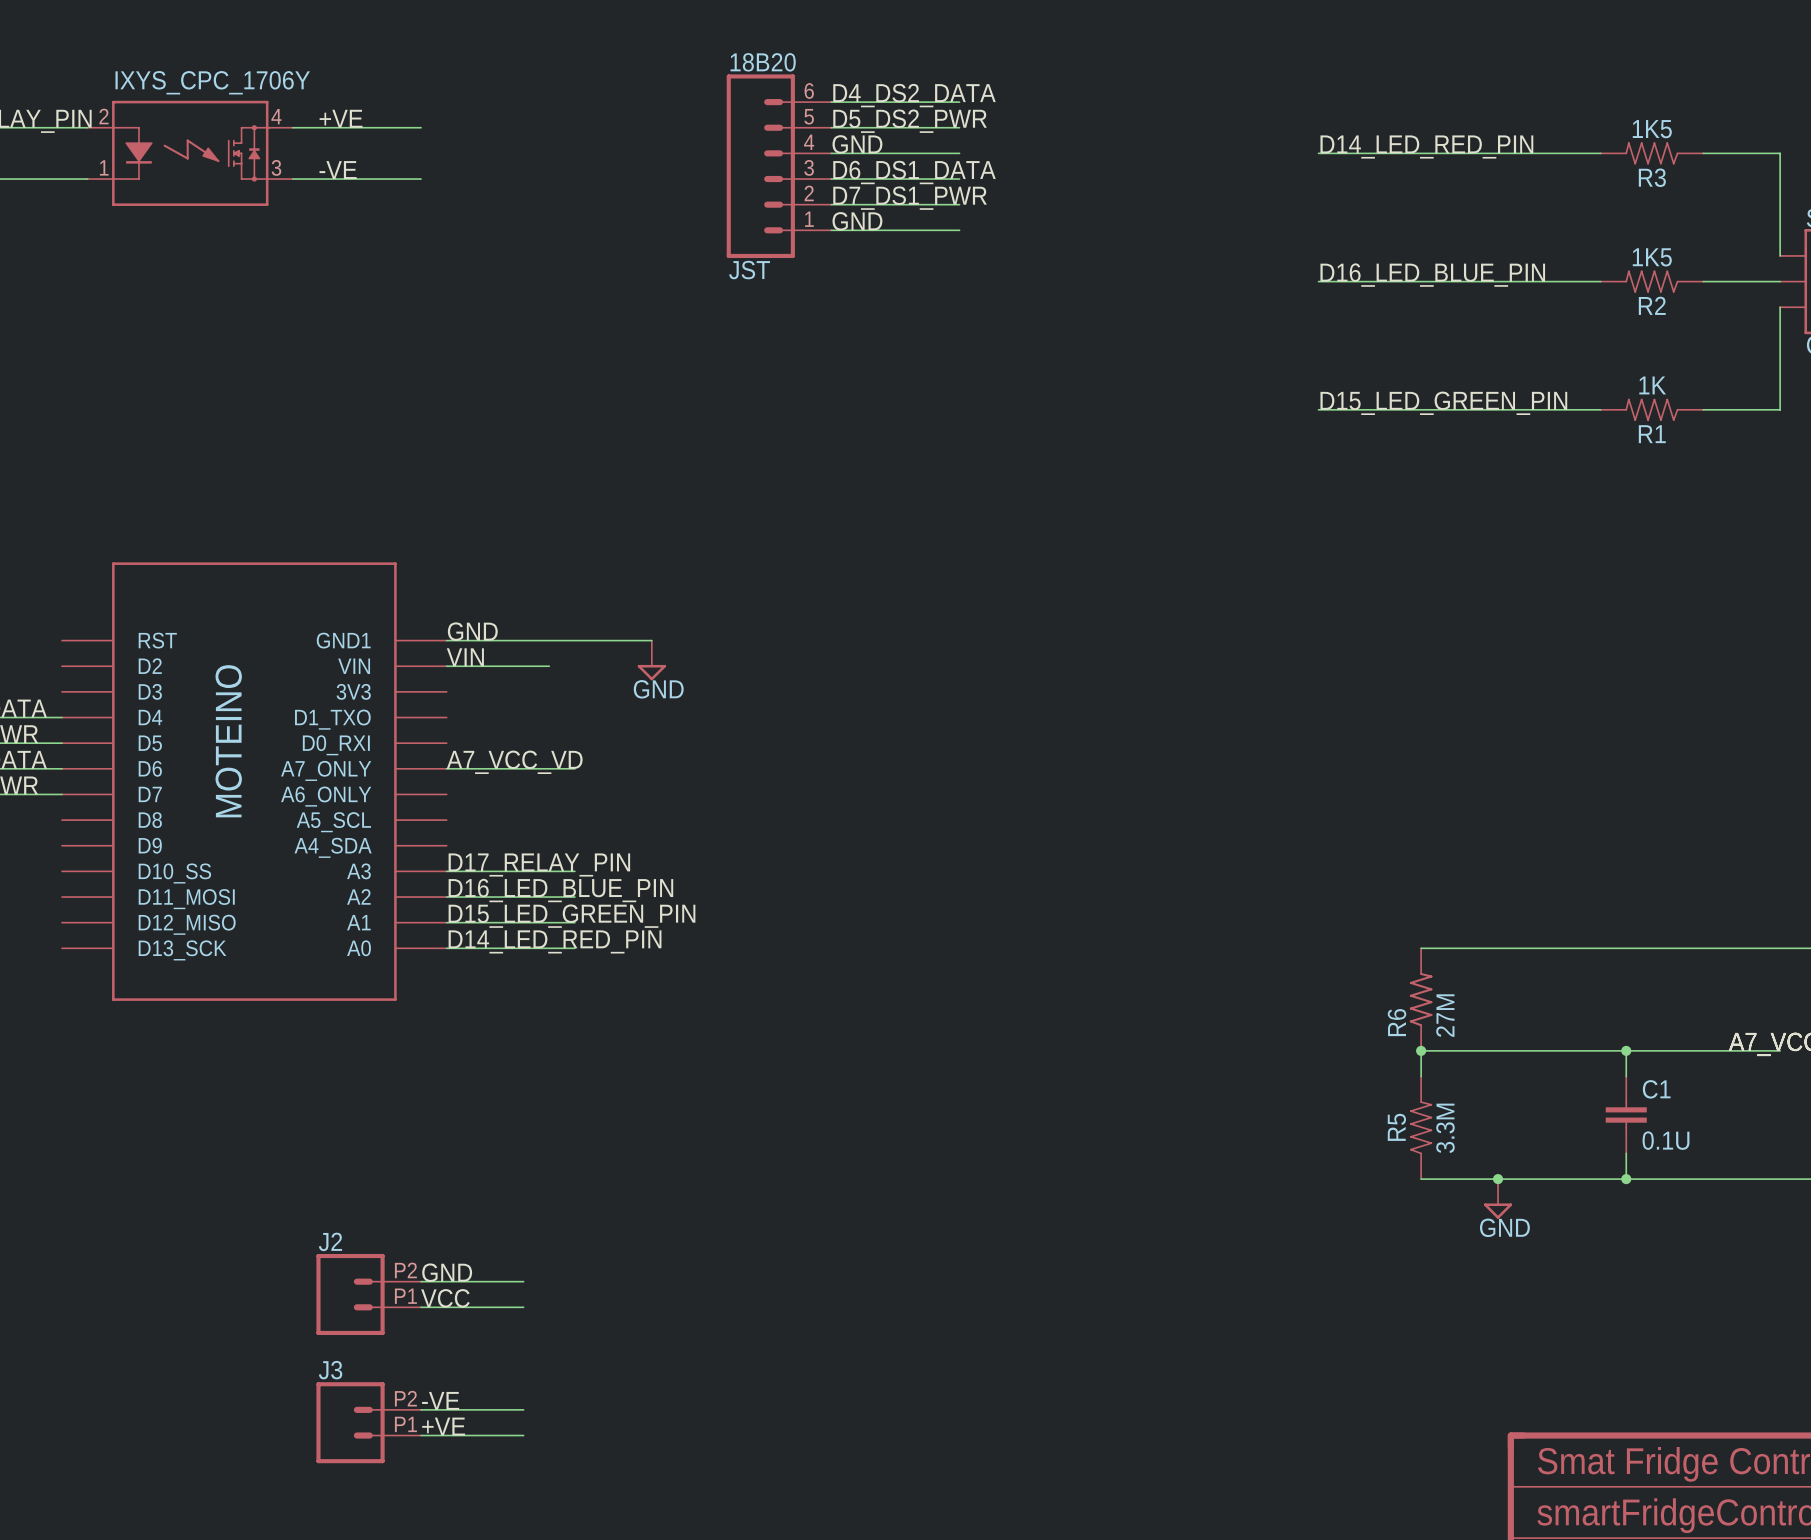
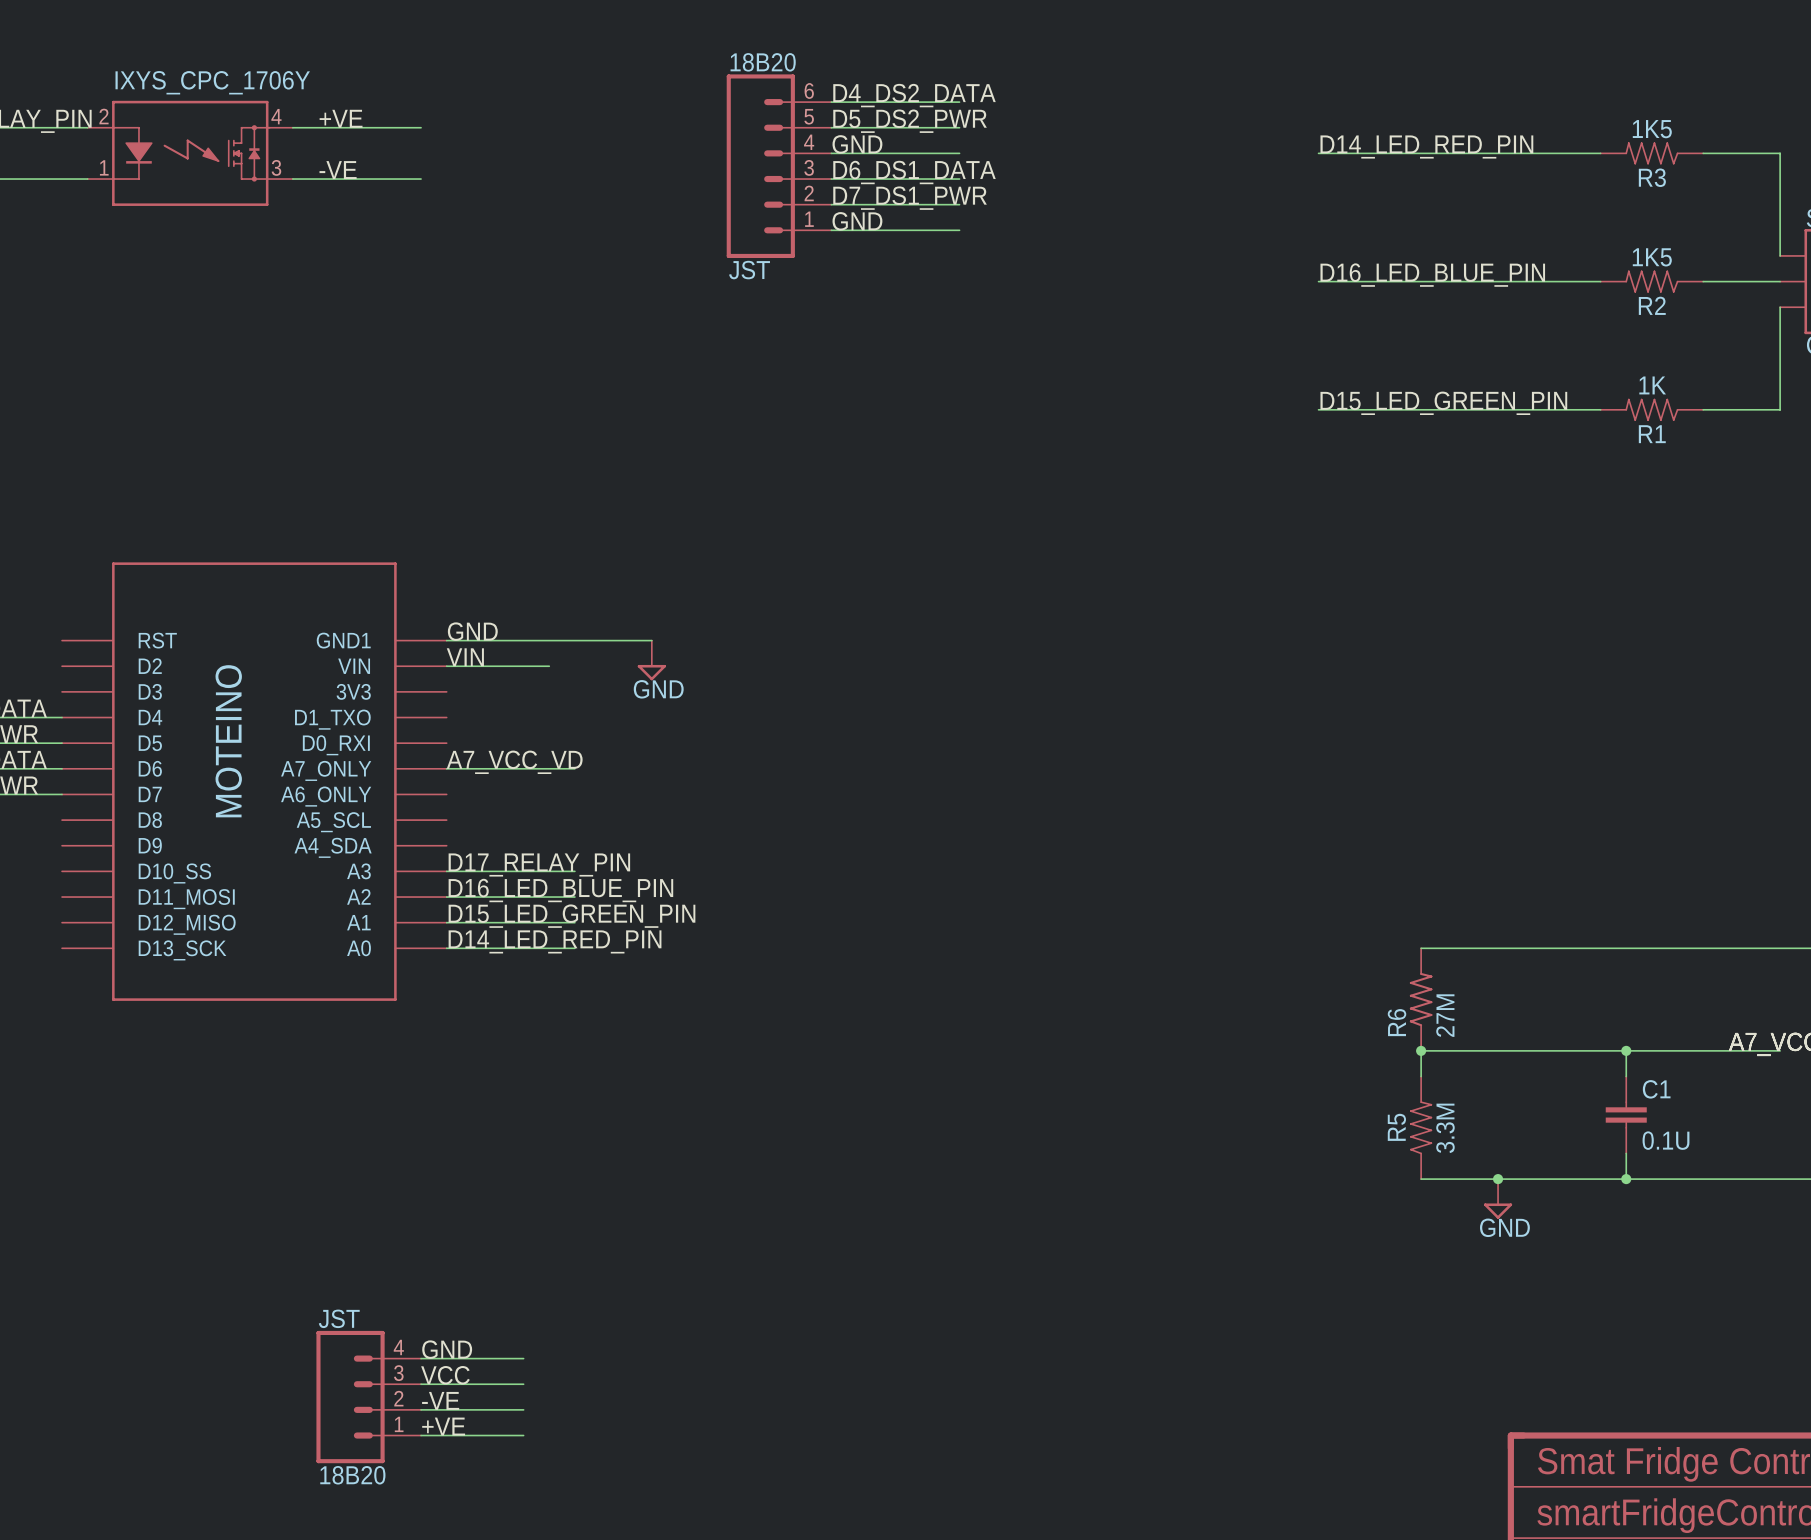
label position: GND (447, 1272) -> GND (447, 1349)
wire: (421, 1281) (523, 1281) -> (421, 1384) (523, 1384)
J2: (368, 1294) -> none
label position: VCC (445, 1298) -> VCC (445, 1375)
wire: (421, 1307) (523, 1307) -> (421, 1358) (523, 1358)
JST: none -> 18B20 (368, 1397)
J3: (368, 1422) -> none

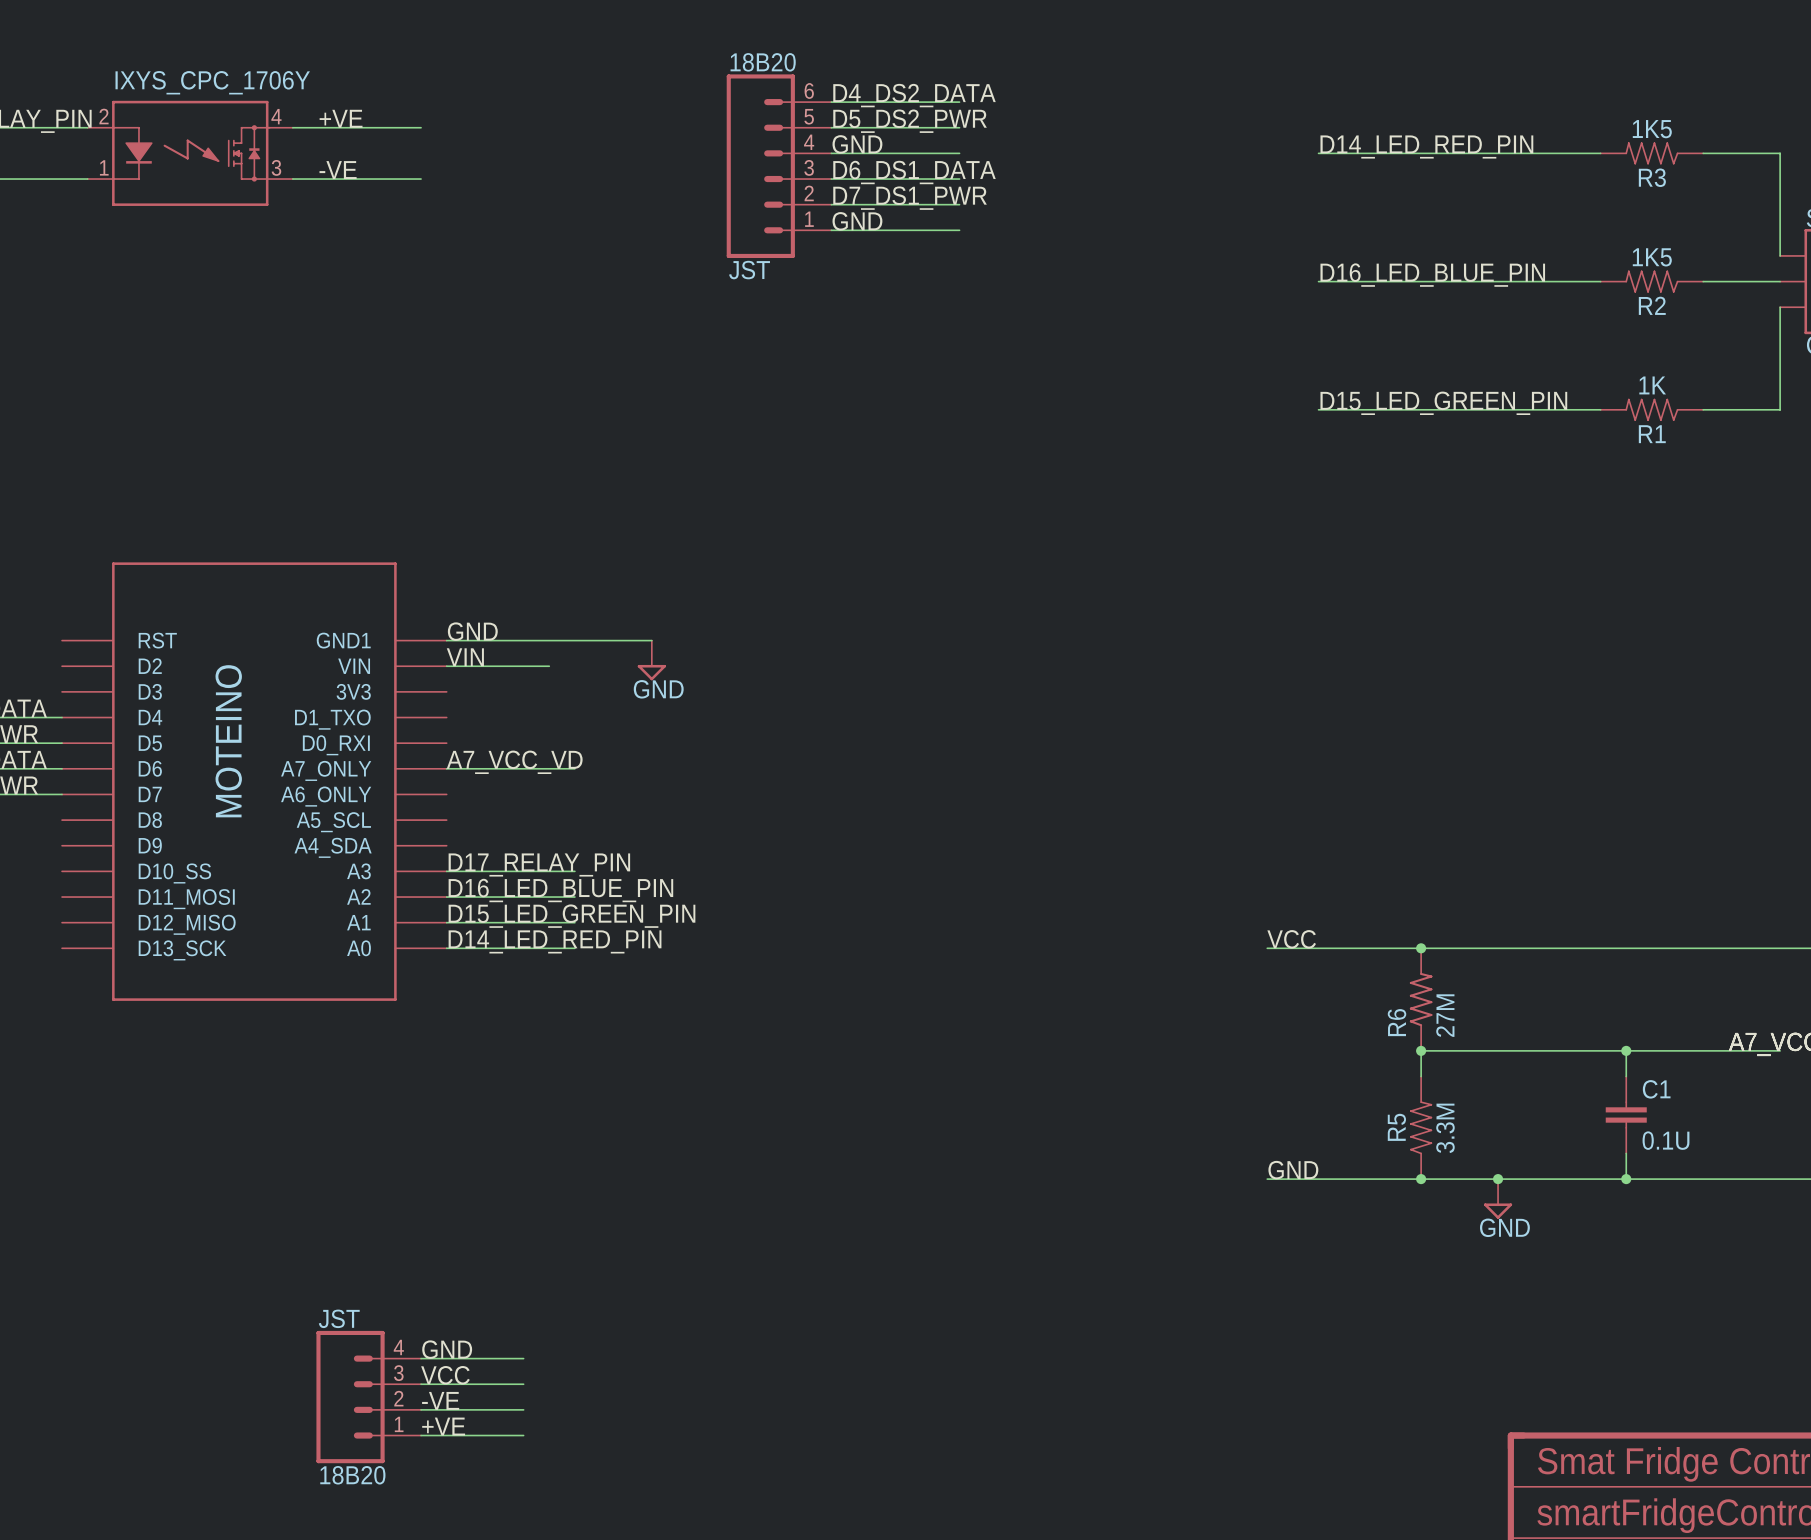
label: none -> VCC (1291, 939)
wire: none -> (1267, 948) (1421, 948)
junction: none -> (1421, 948)
label: none -> GND (1293, 1170)
wire: none -> (1267, 1179) (1421, 1179)
junction: none -> (1421, 1179)

